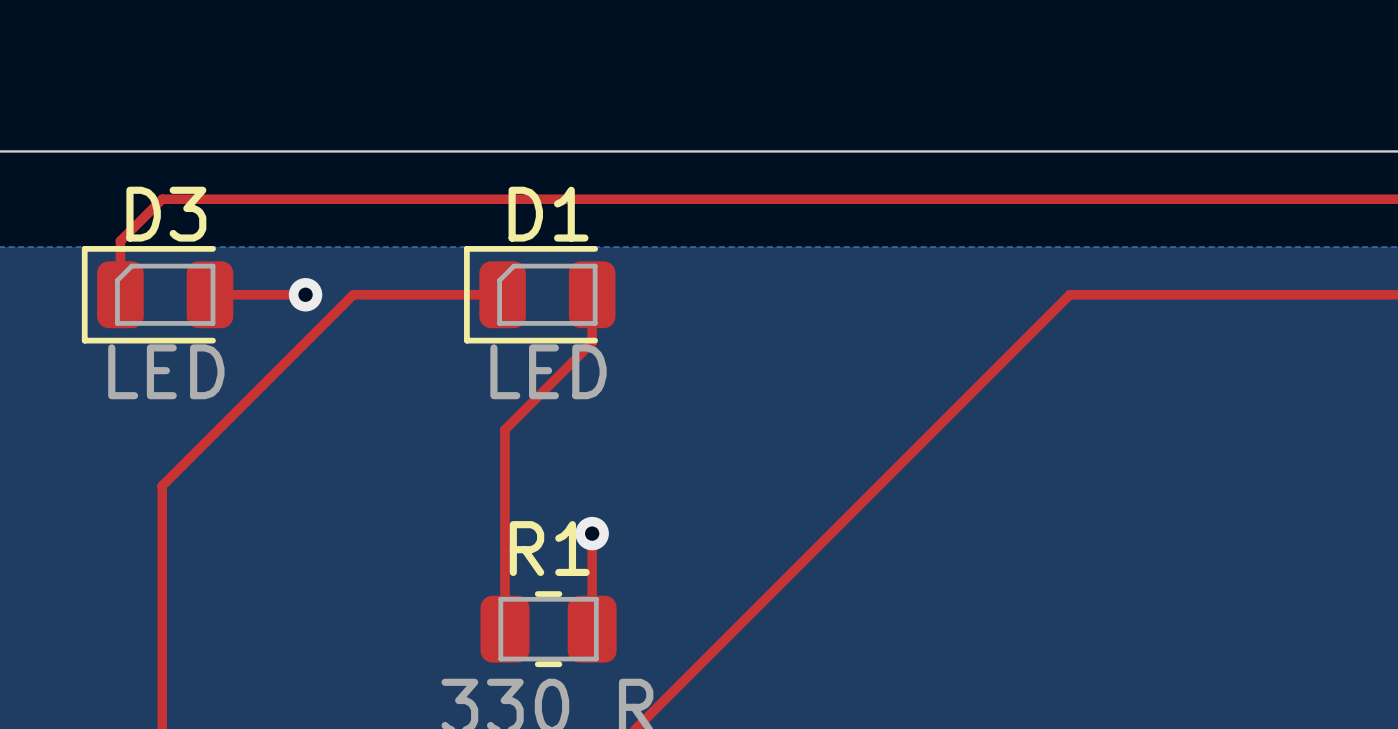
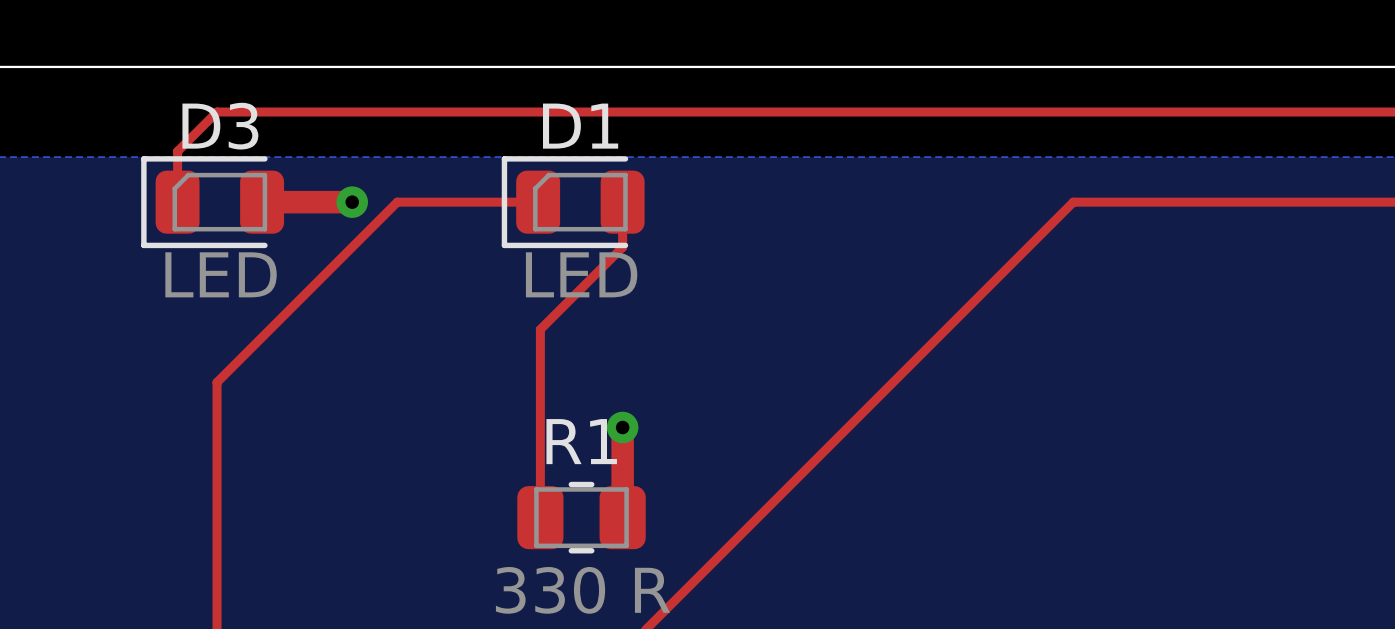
top track width: thin (210, 294) (305, 294) -> thick (262, 202) (352, 202)
top track width: thin (592, 533) (592, 629) -> thick (622, 427) (622, 517)

